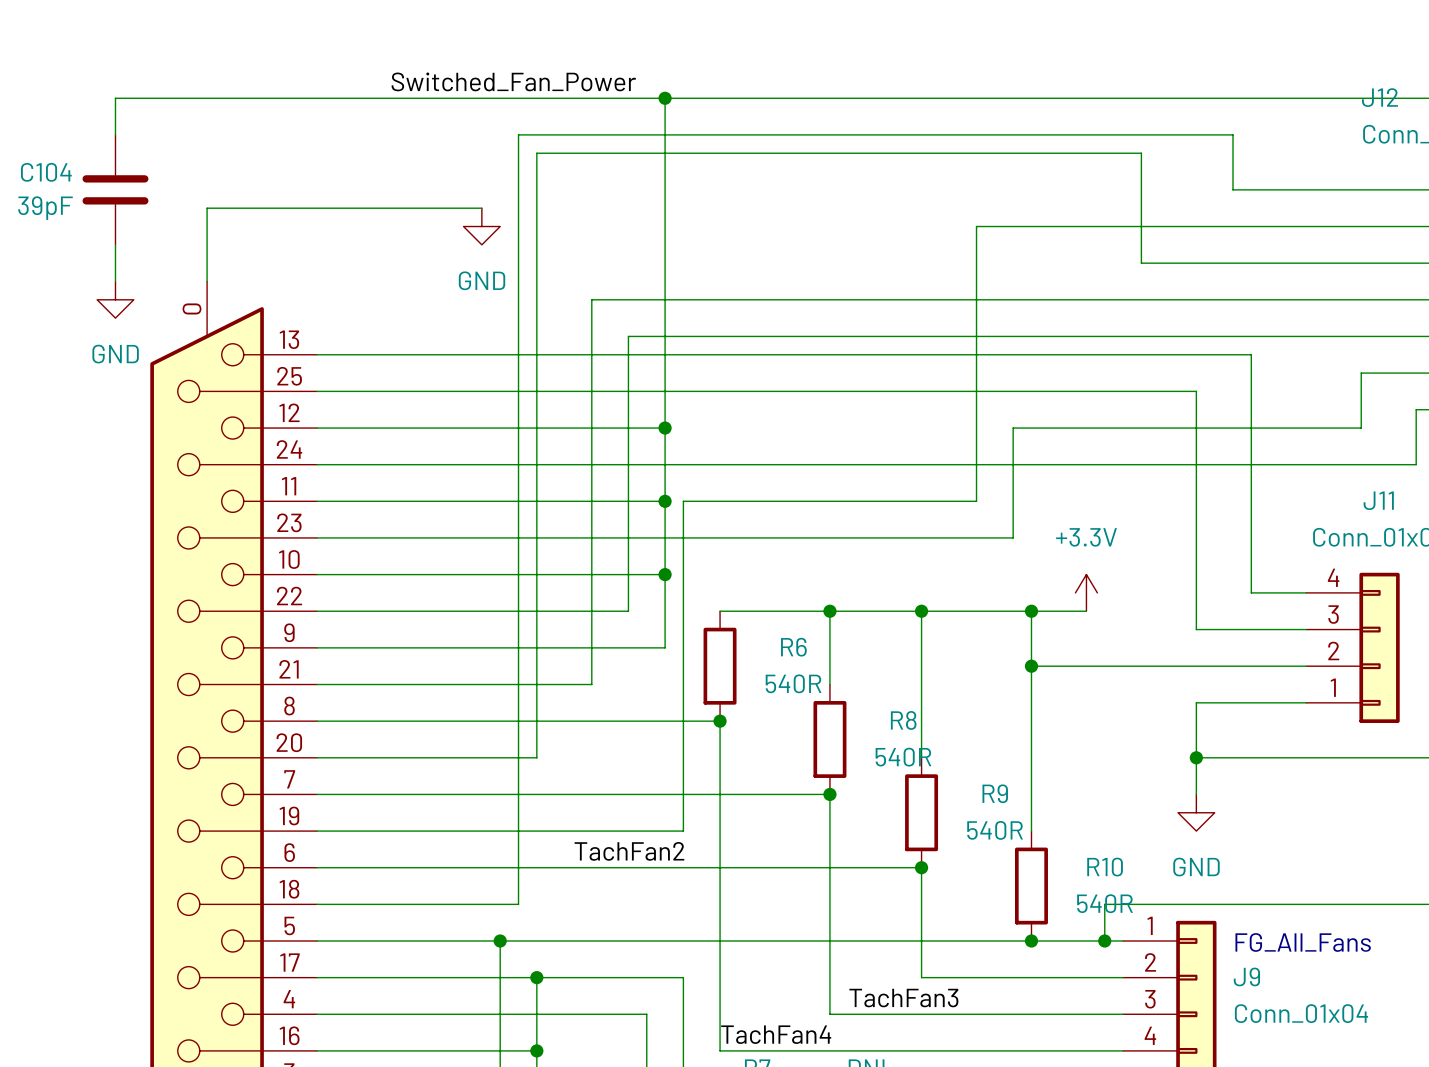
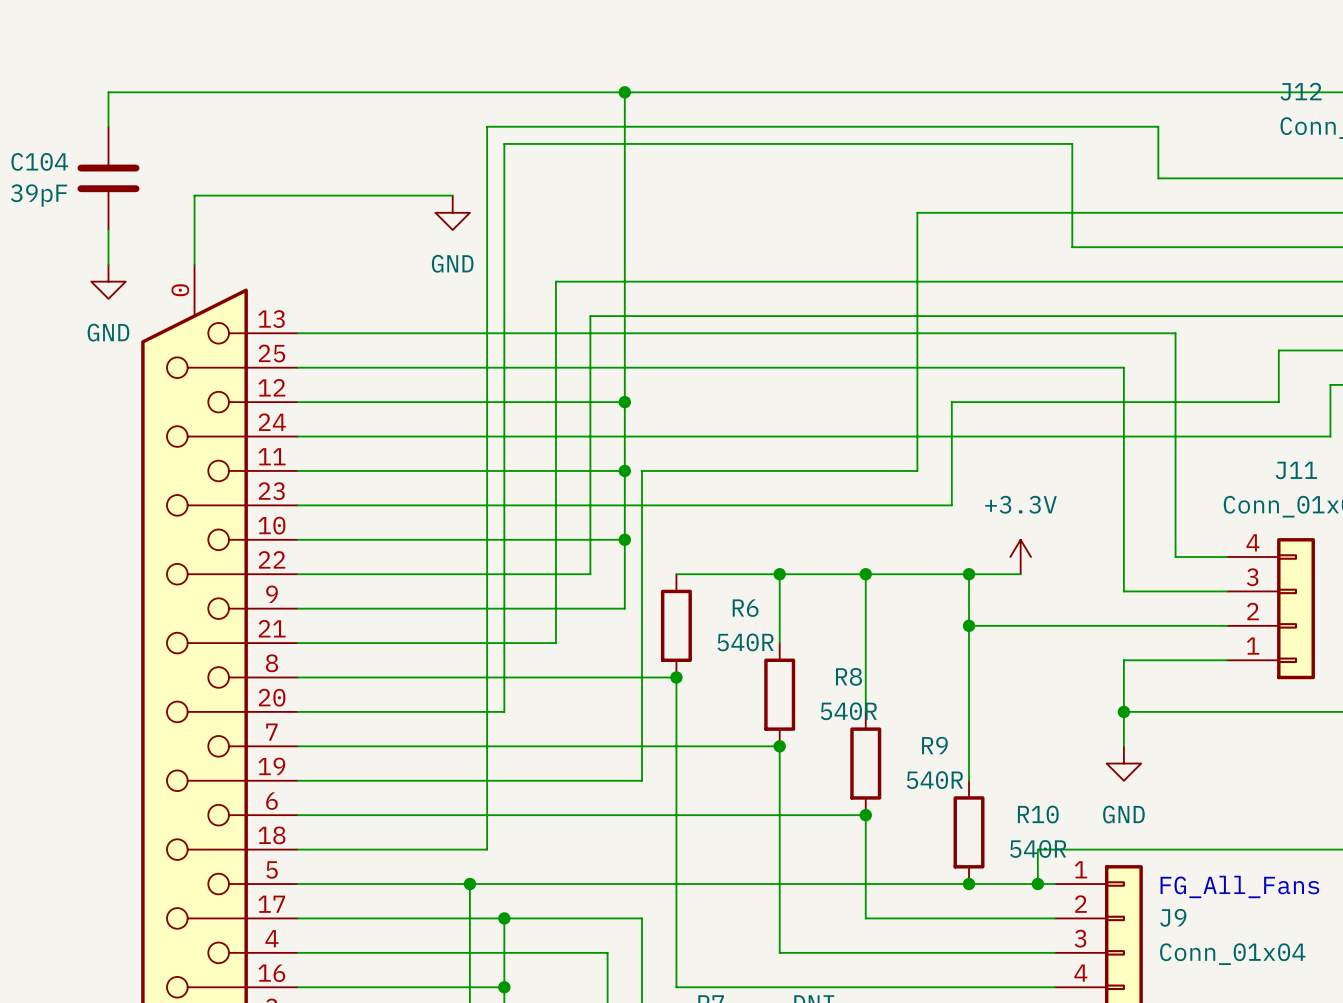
label: Switched_Fan_Power (513, 81) -> none
label: TachFan2 (629, 851) -> none
label: TachFan3 (903, 998) -> none
label: TachFan4 (776, 1034) -> none

